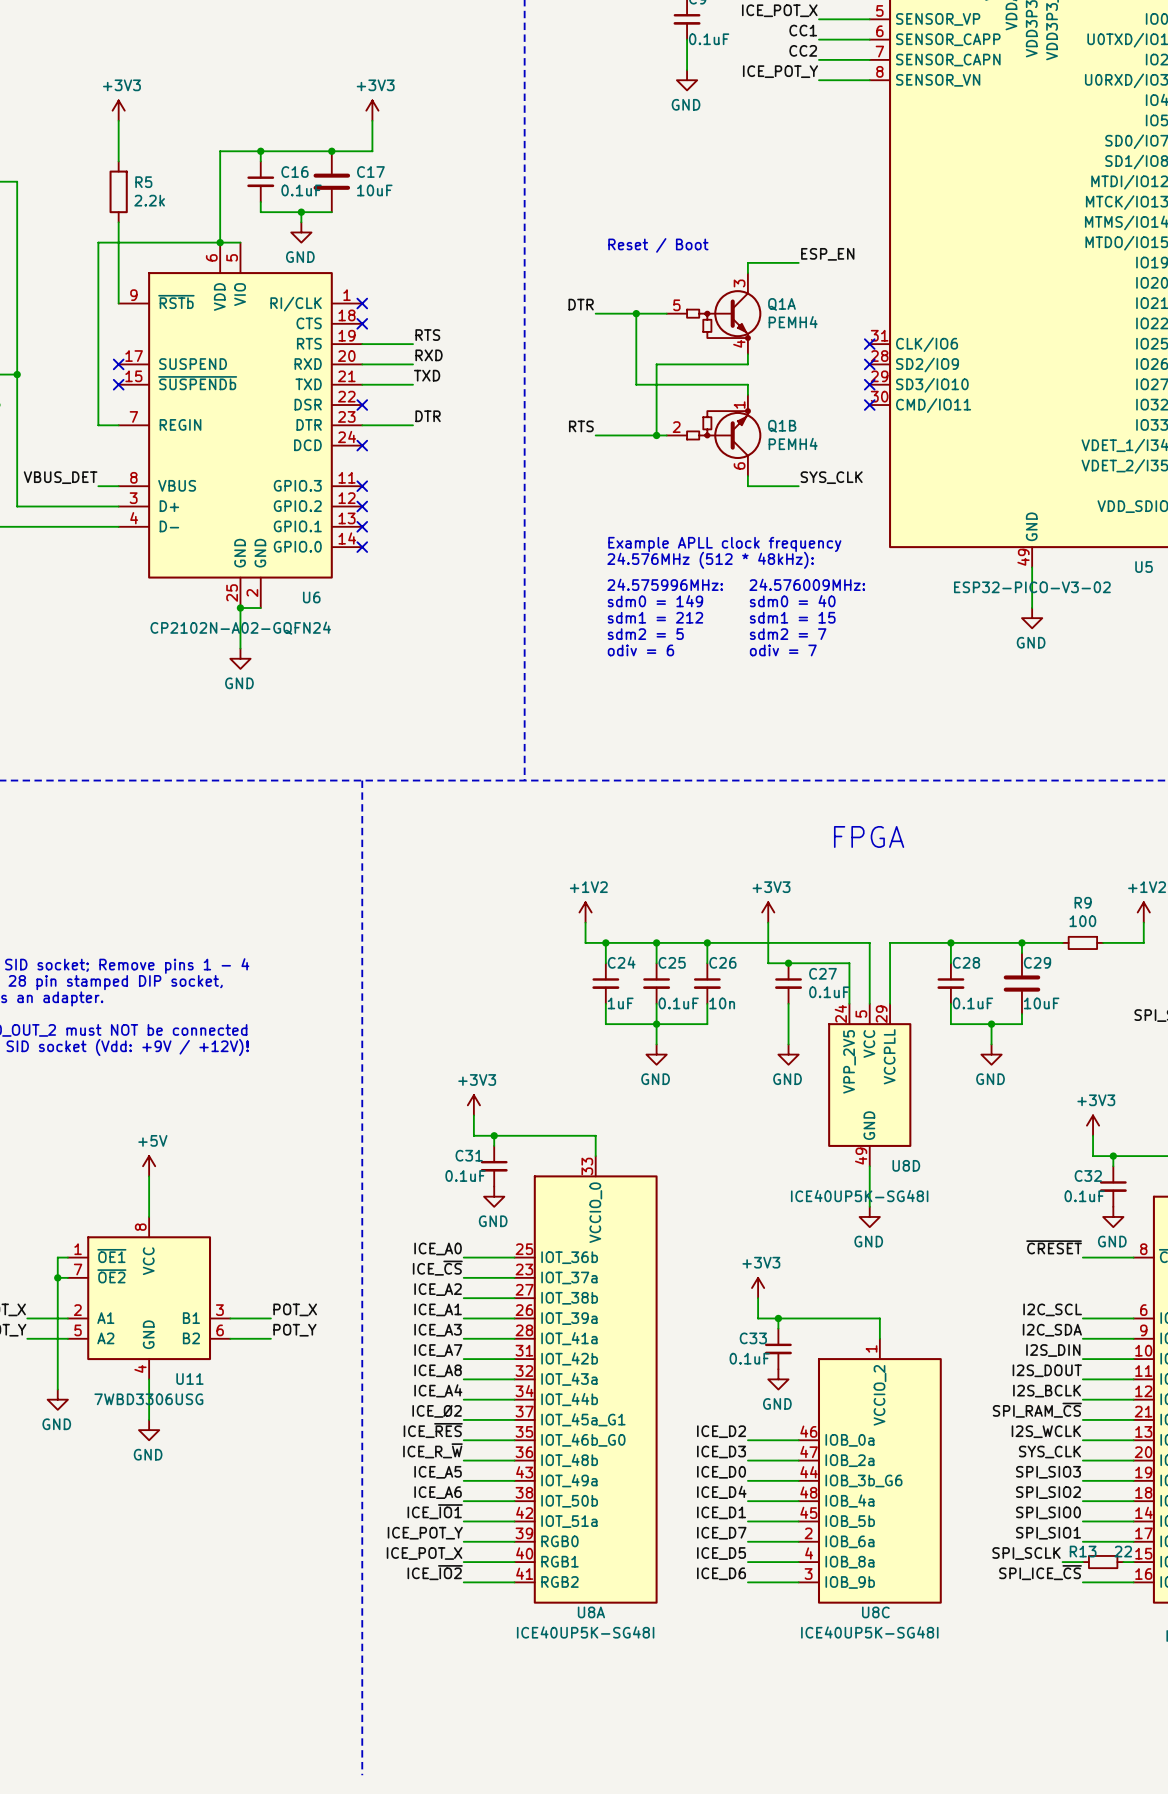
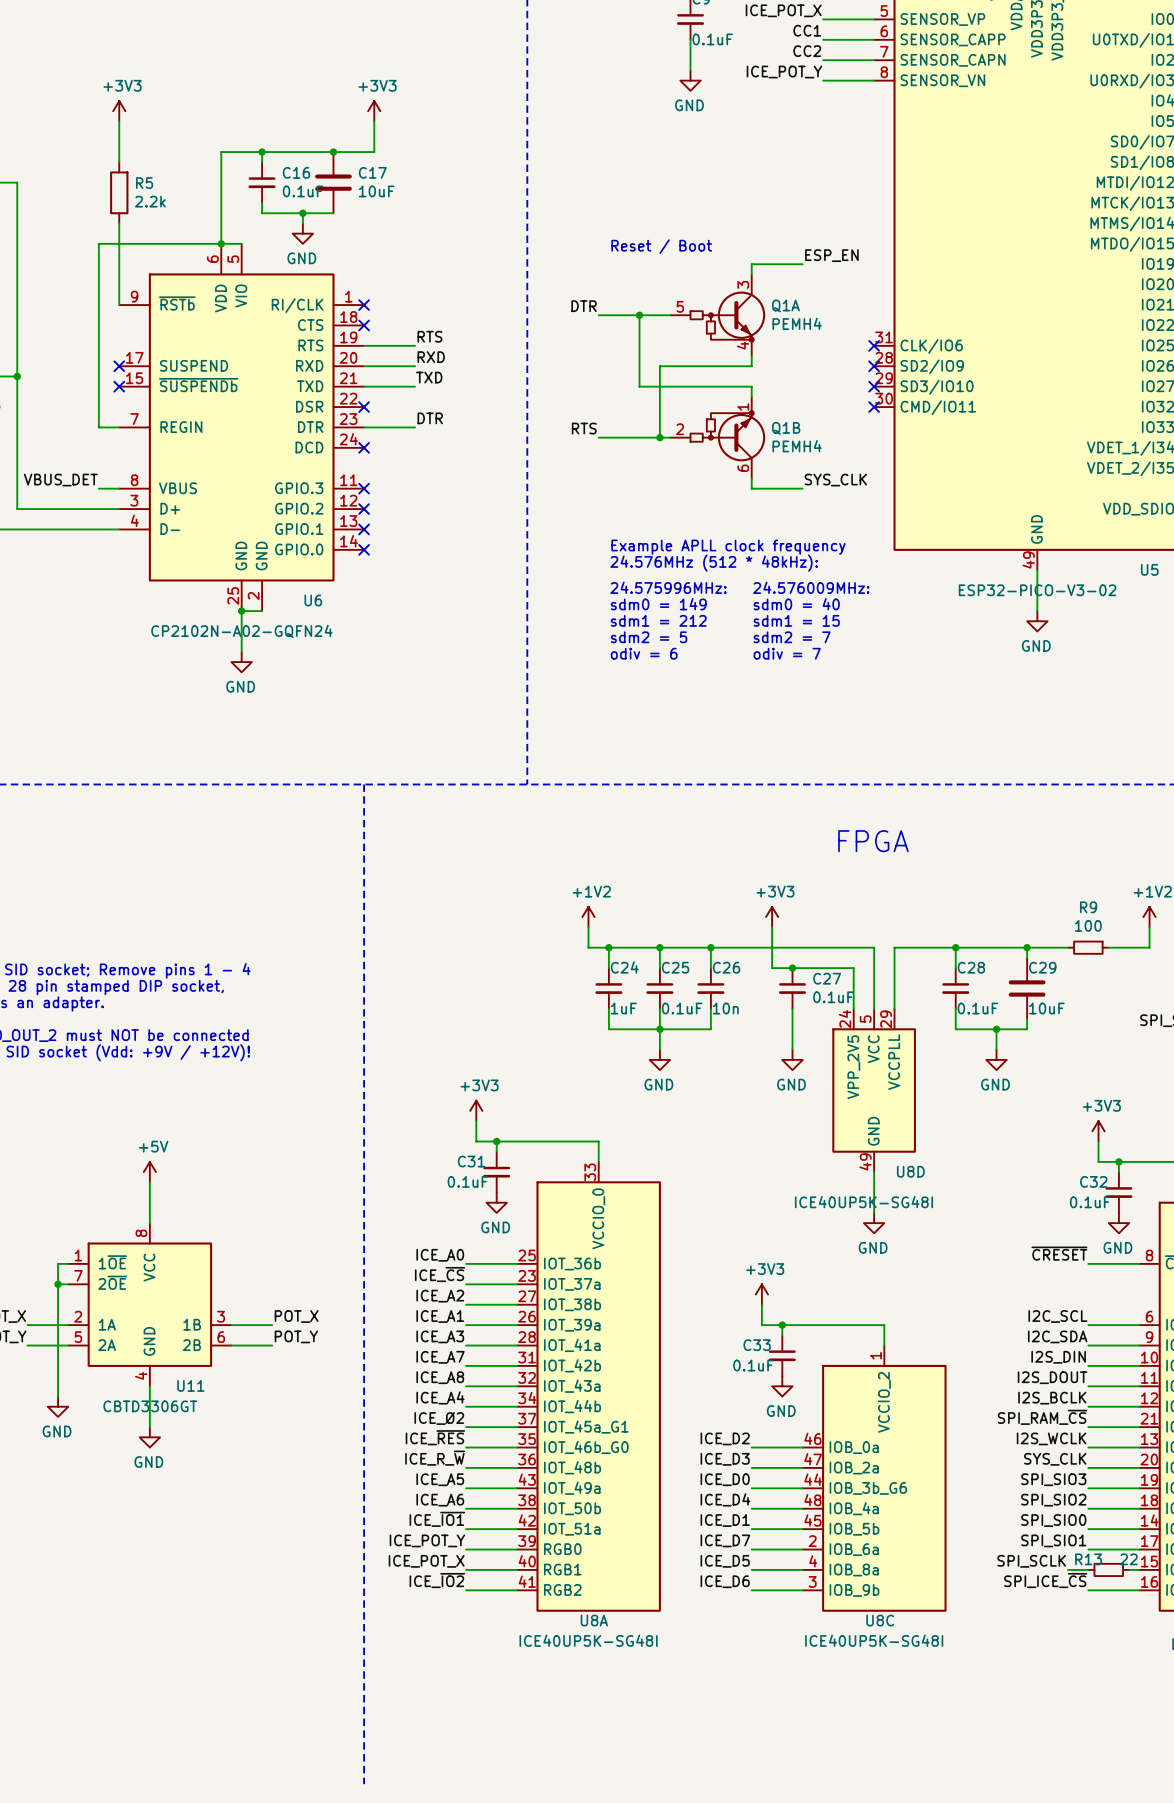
U11 pin name: ~{OE1} (111, 1256) -> 1~{OE} (112, 1262)
U11 pin name: ~{OE2} (111, 1276) -> 2~{OE} (112, 1282)
U11 pin name: A1 (105, 1318) -> 1A (107, 1324)
U11 pin name: B1 (191, 1318) -> 1B (192, 1324)
U11 pin name: A2 (105, 1338) -> 2A (107, 1345)
U11 pin name: B2 (191, 1338) -> 2B (191, 1345)
U11 value: 7WBD3306USG (148, 1399) -> CBTD3306GT (150, 1406)

